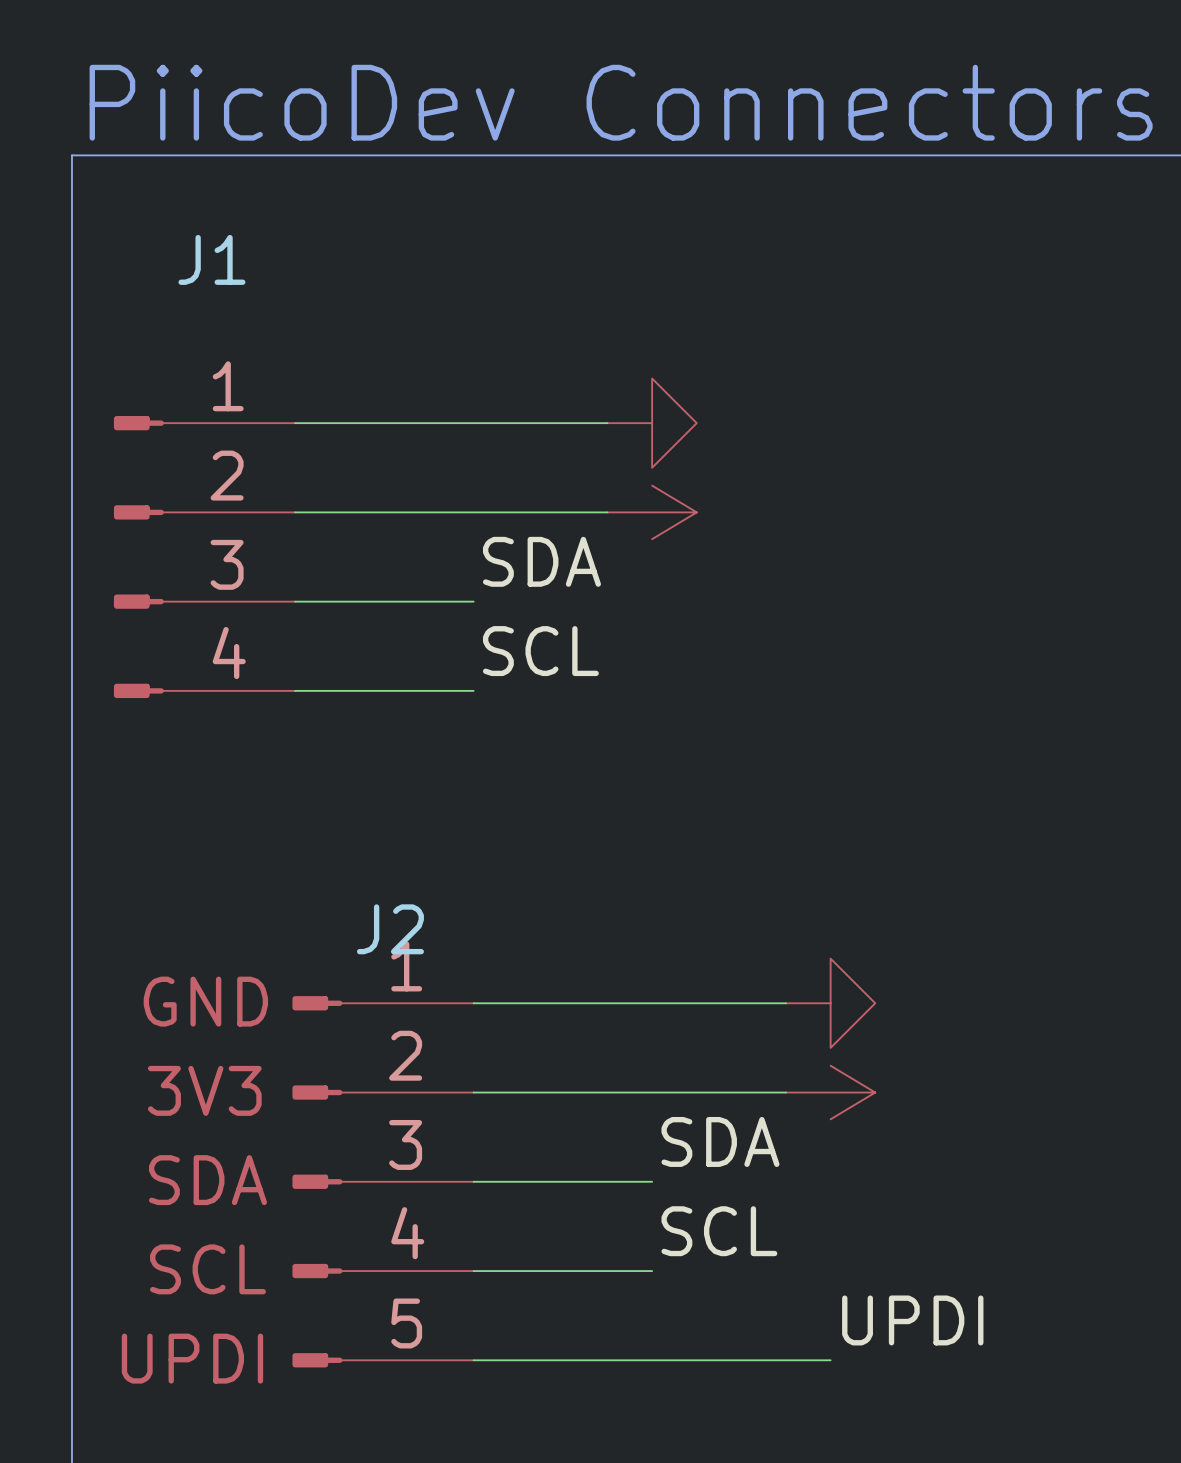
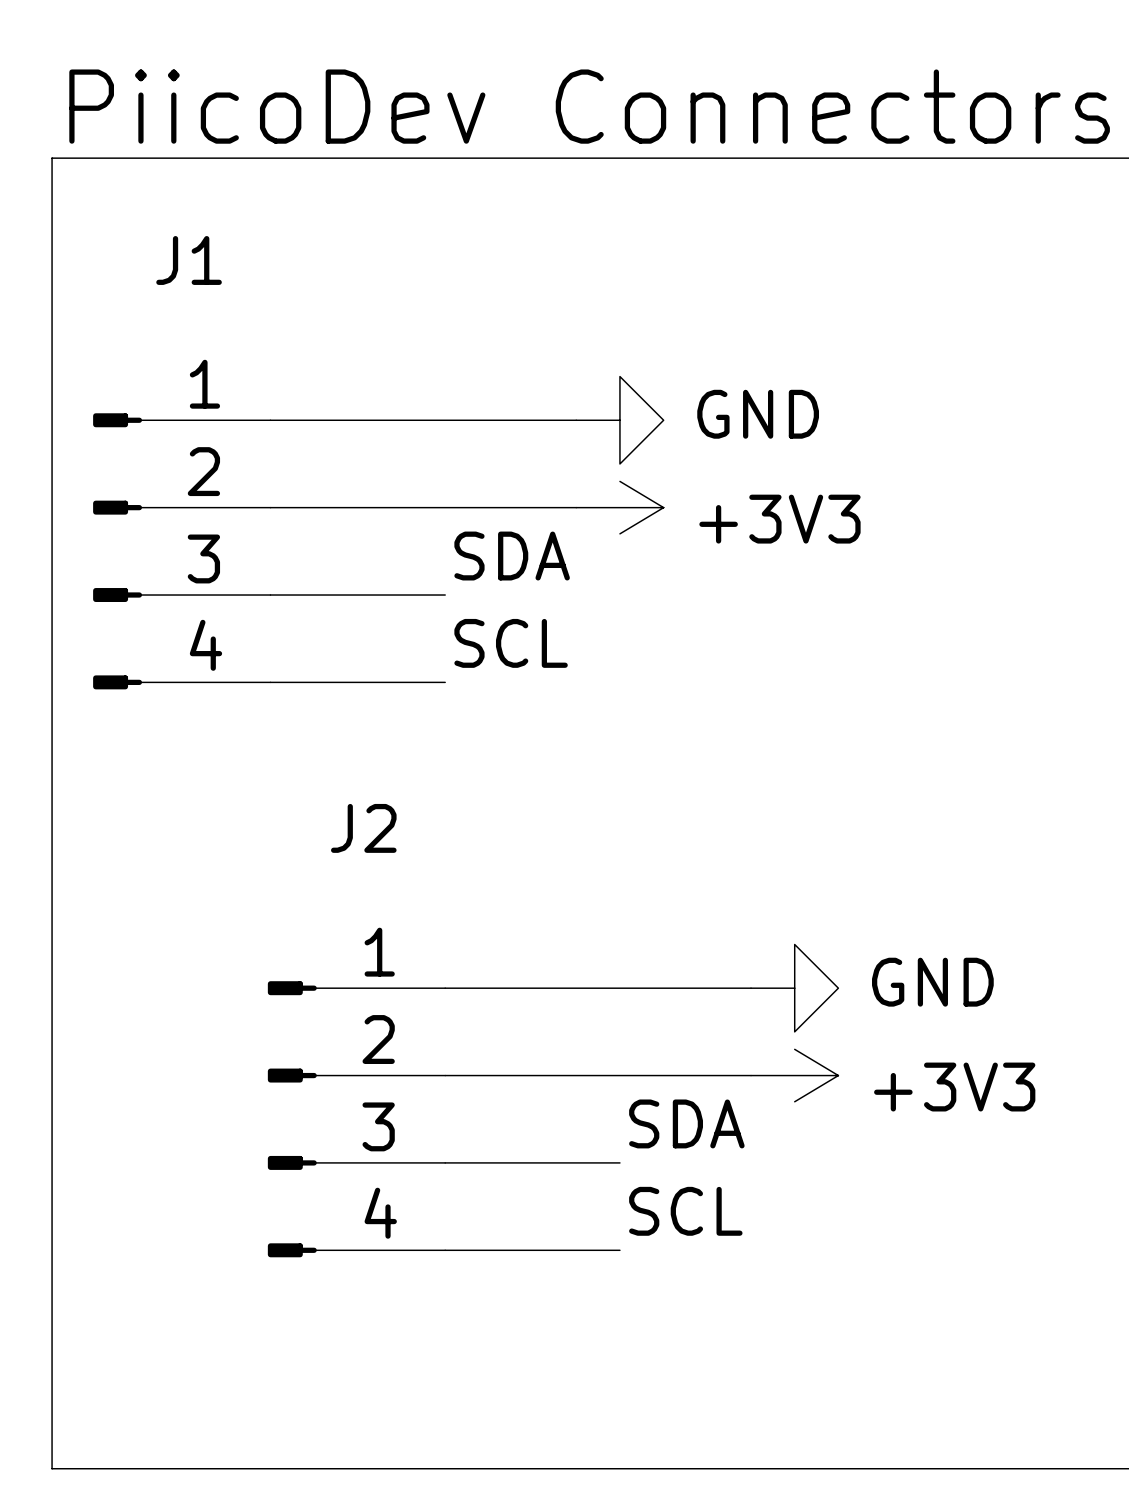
power symbol text: none -> GND (758, 414)
power symbol text: none -> +3V3 (779, 519)
J2 symbol: [292, 996, 474, 1368] -> [267, 981, 446, 1258]
power symbol text: none -> GND (932, 982)
power symbol text: none -> +3V3 (954, 1087)
label: UPDI (912, 1320) -> none
wire: (473, 1360) (830, 1360) -> none

